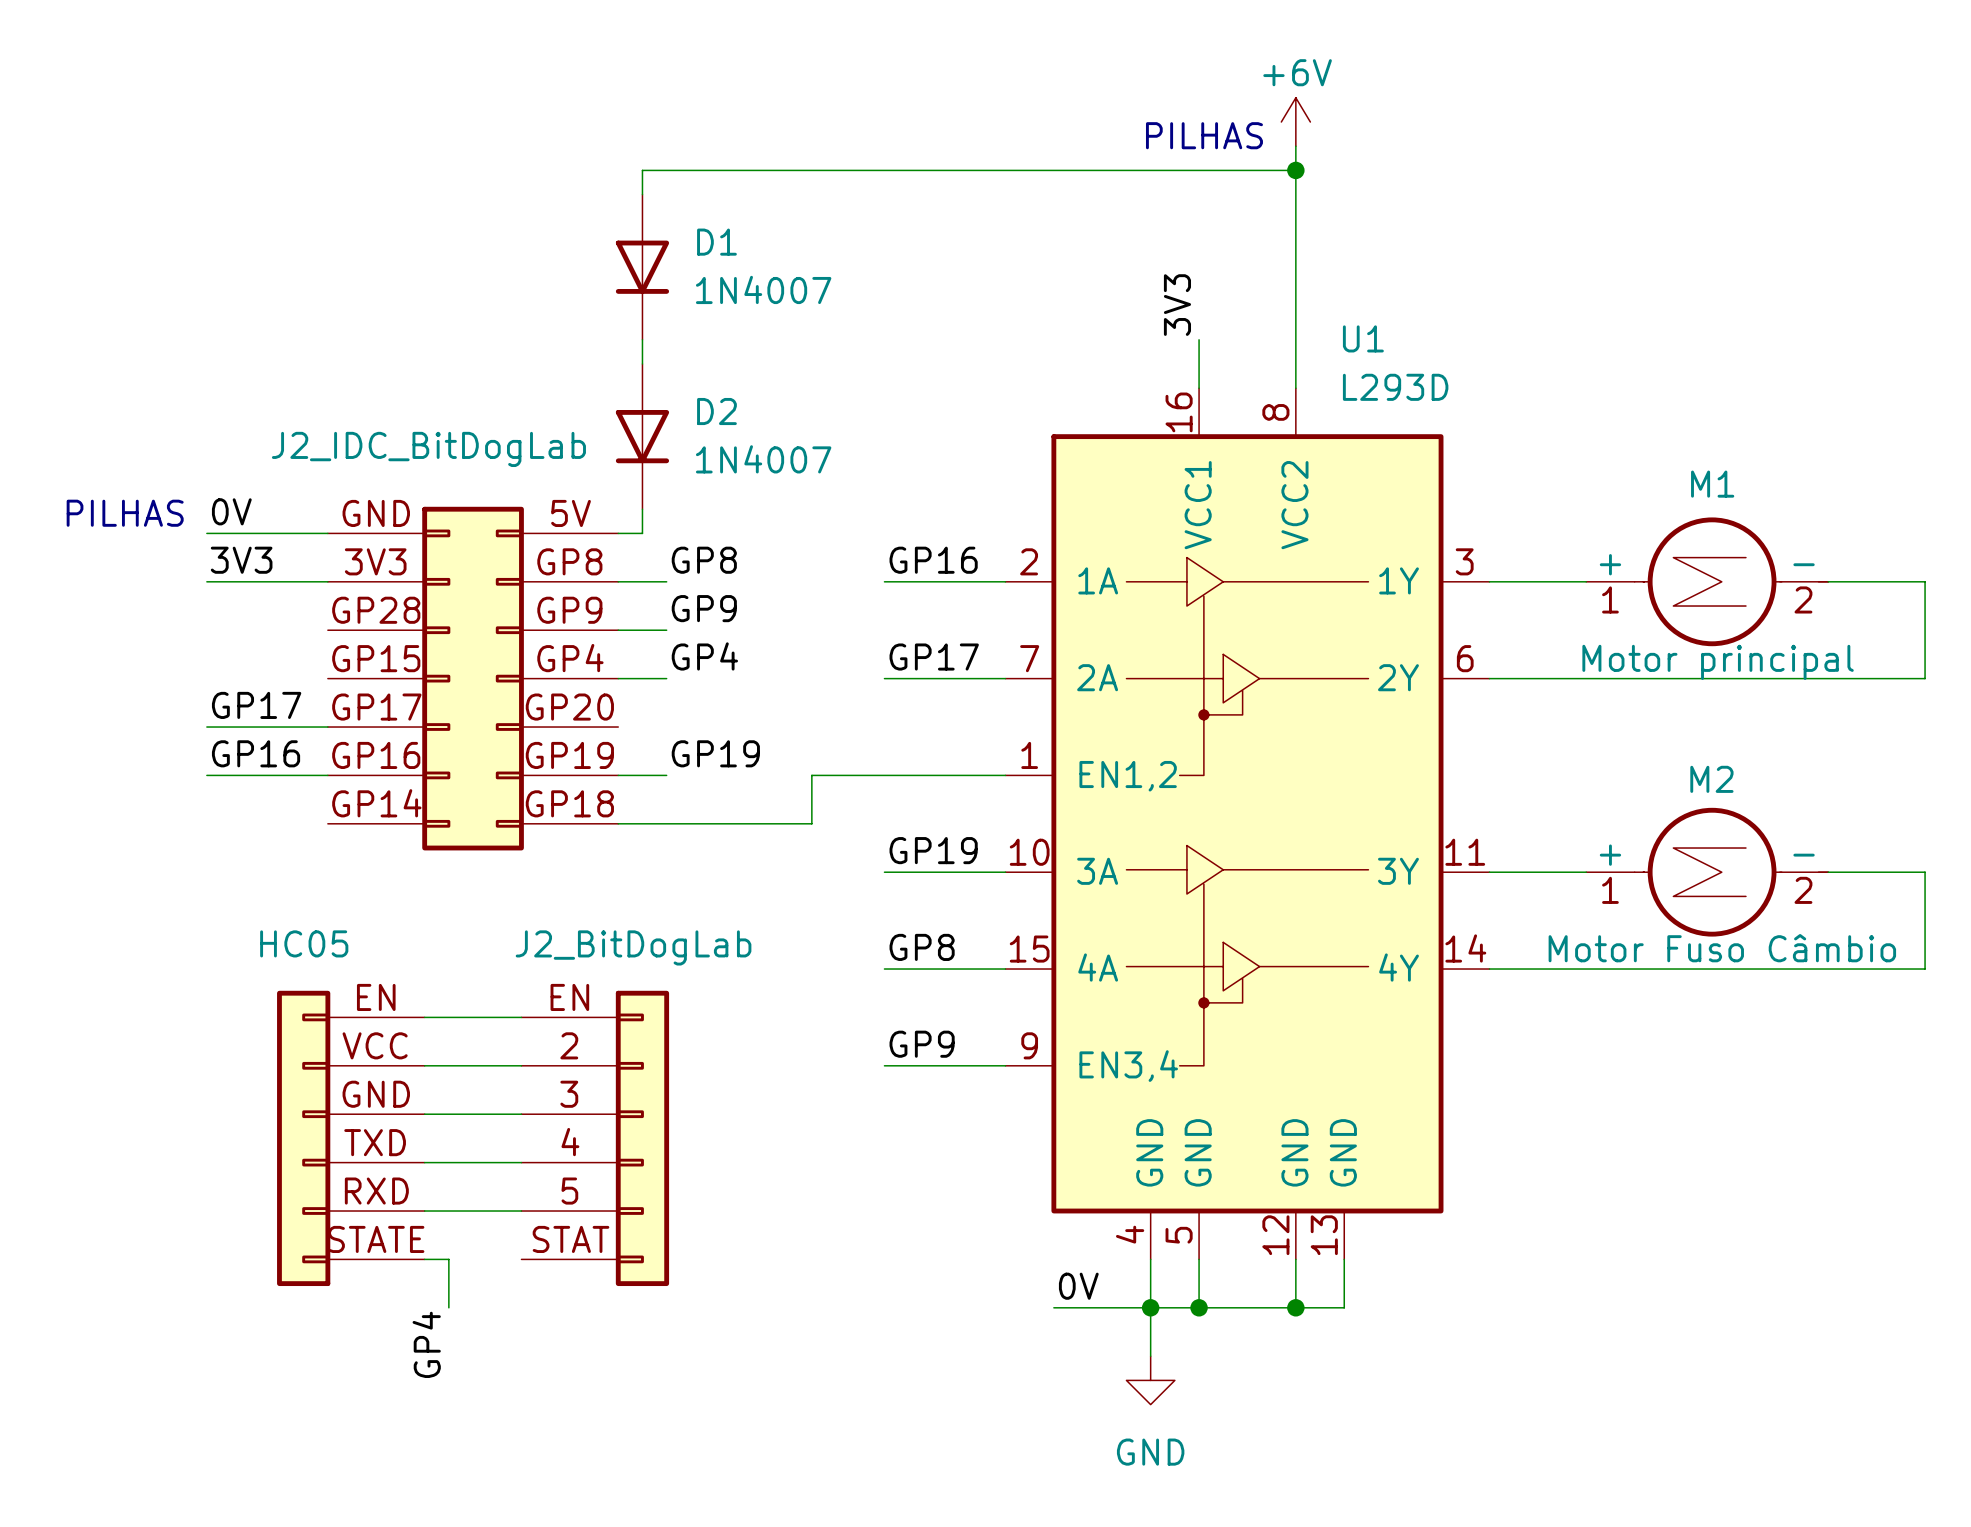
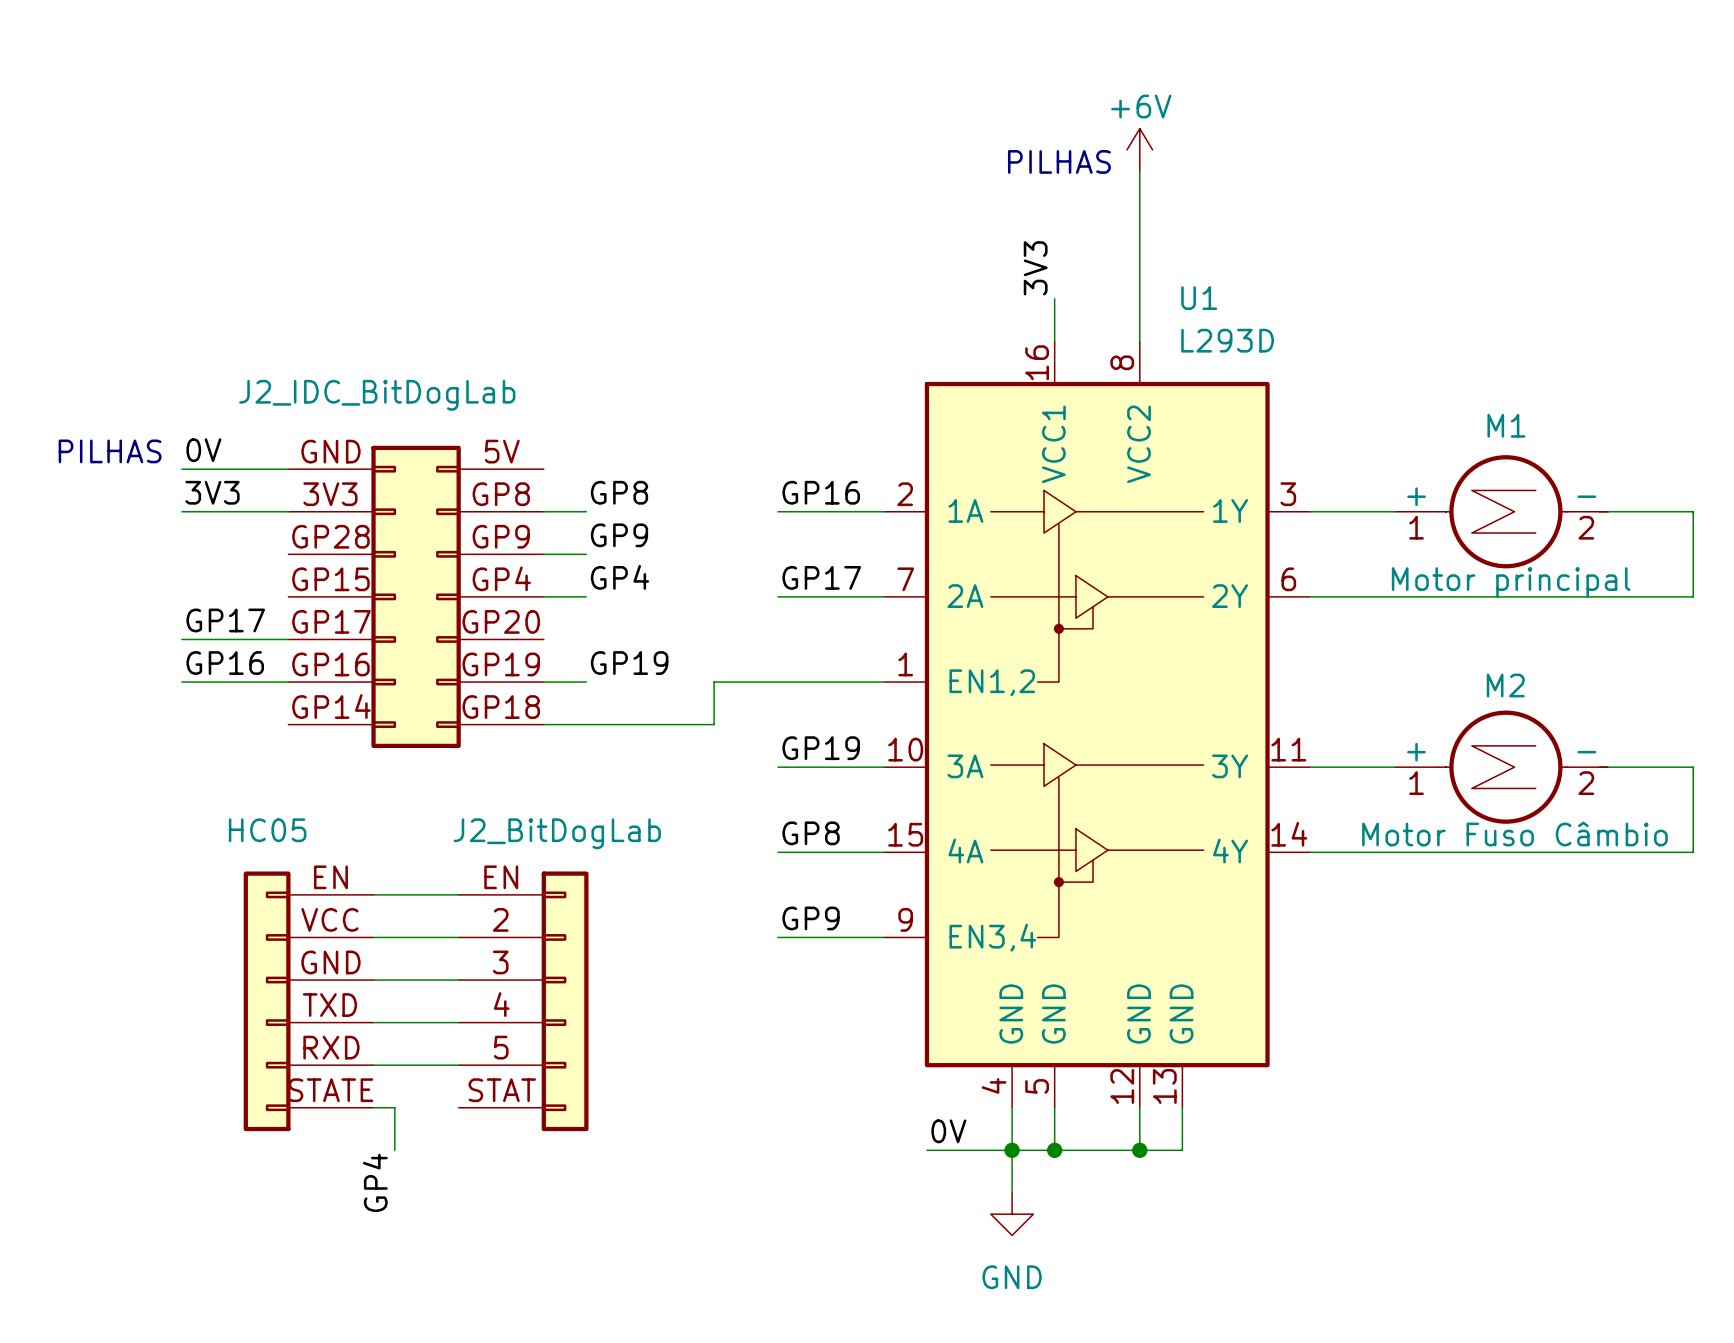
power symbol position: +6V (1295, 122) -> +6V (1139, 149)
text position: PILHAS (1204, 135) -> PILHAS (1059, 161)
wire: (1295, 170) (642, 170) (642, 194) -> none
junction: (1295, 170) -> none
D1: 1N4007 (642, 267) -> none
wire: (642, 339) (642, 364) -> none
D2: 1N4007 (642, 436) -> none
wire: (642, 509) (642, 533) (618, 533) -> none

